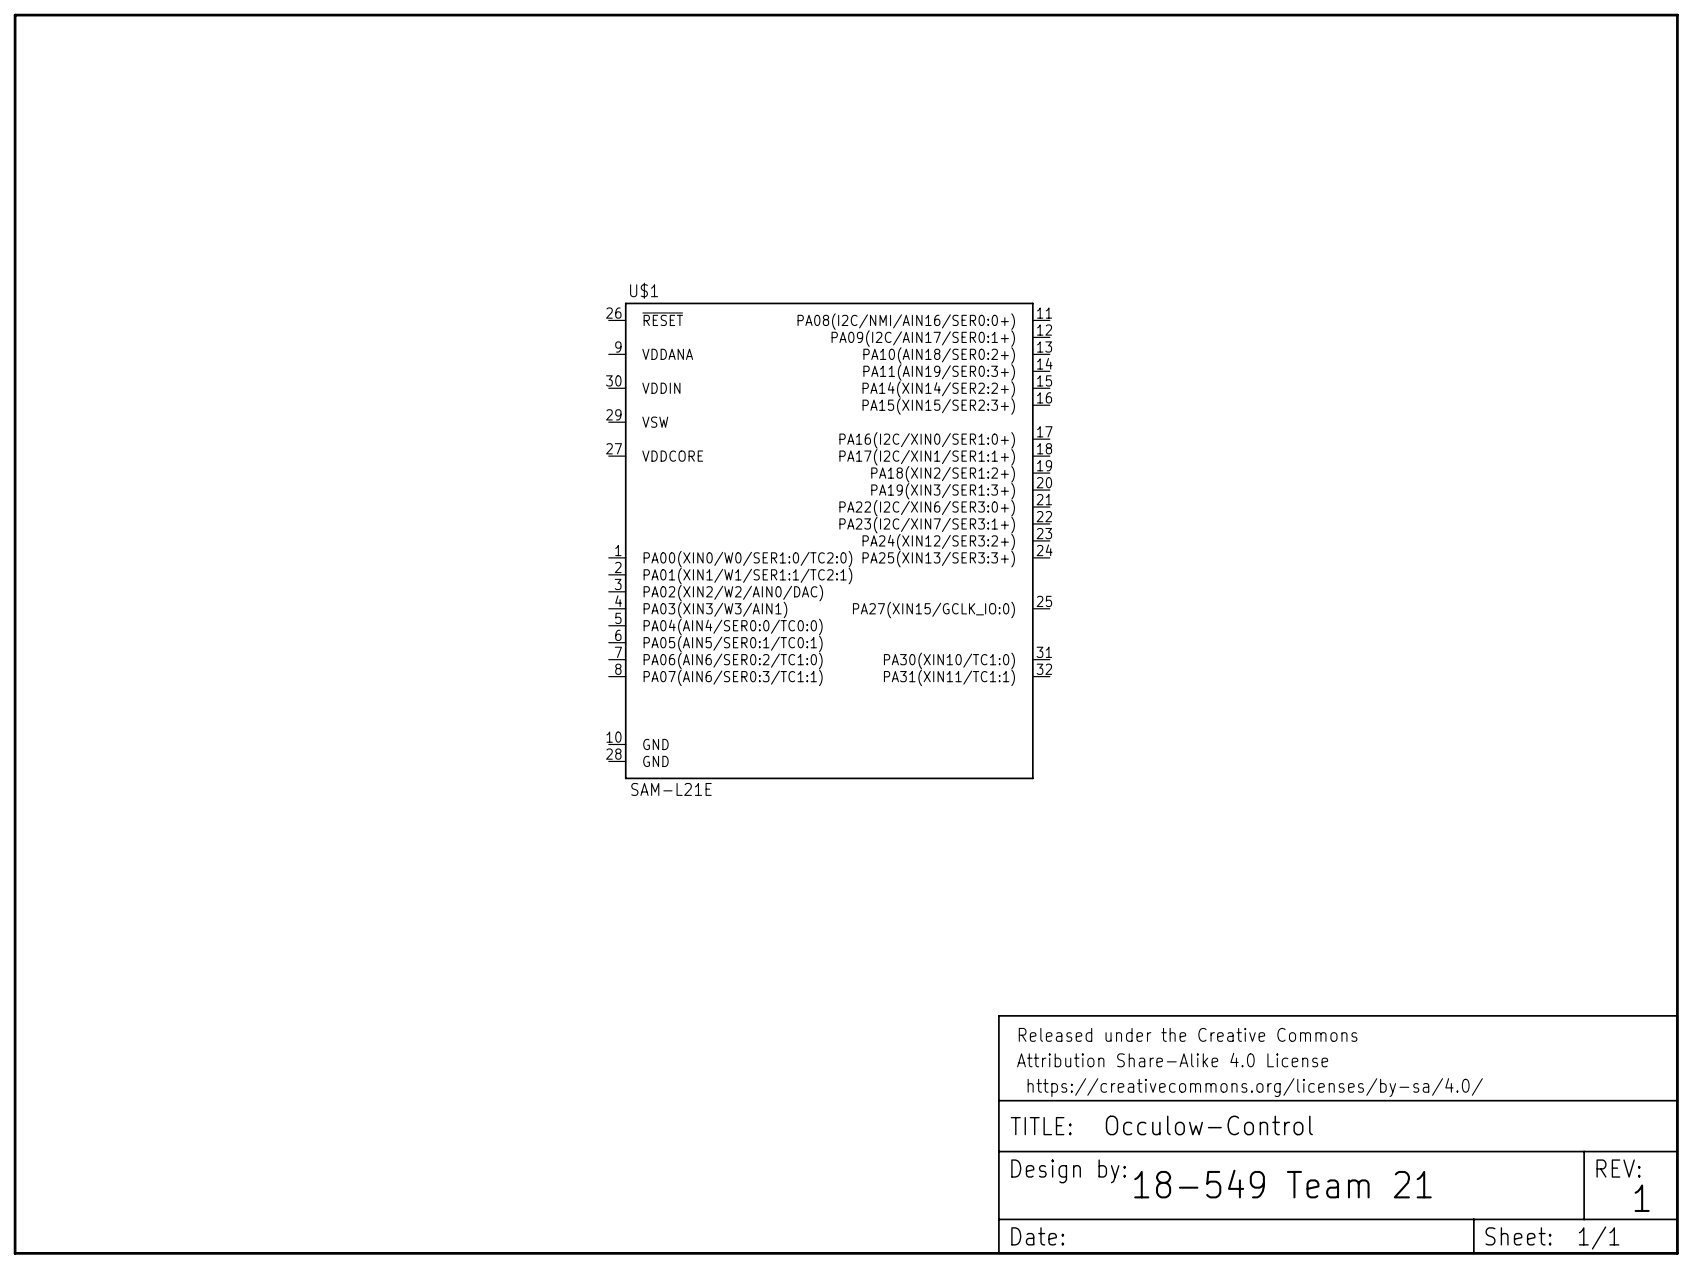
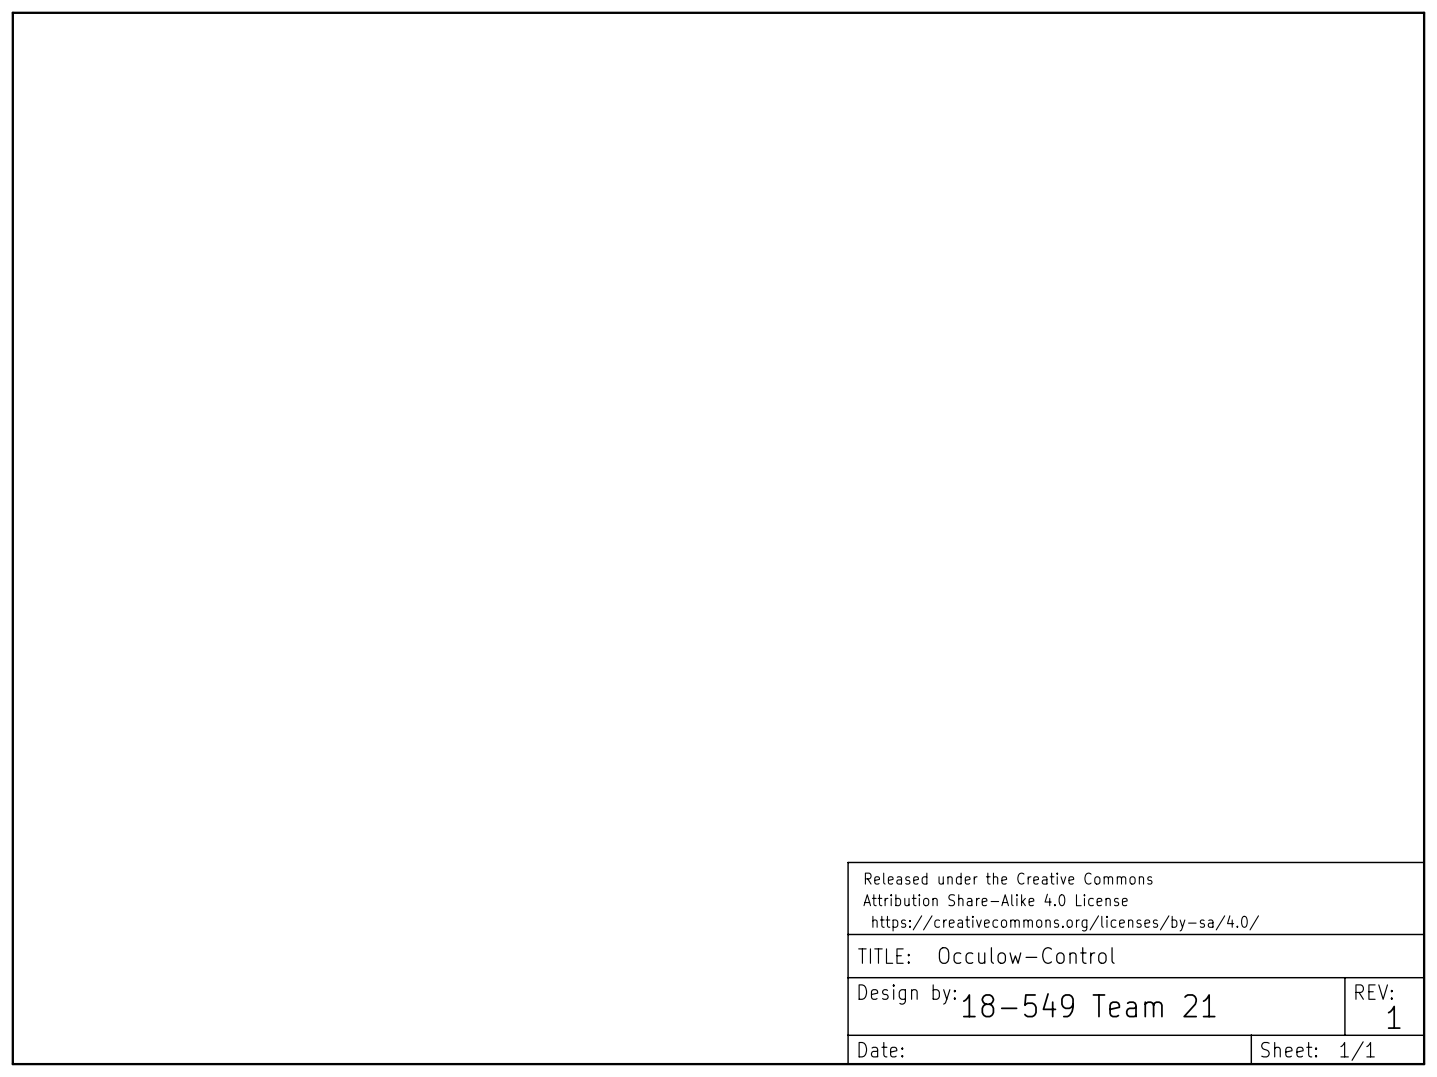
U$1: SAM-L21E (829, 540) -> none

